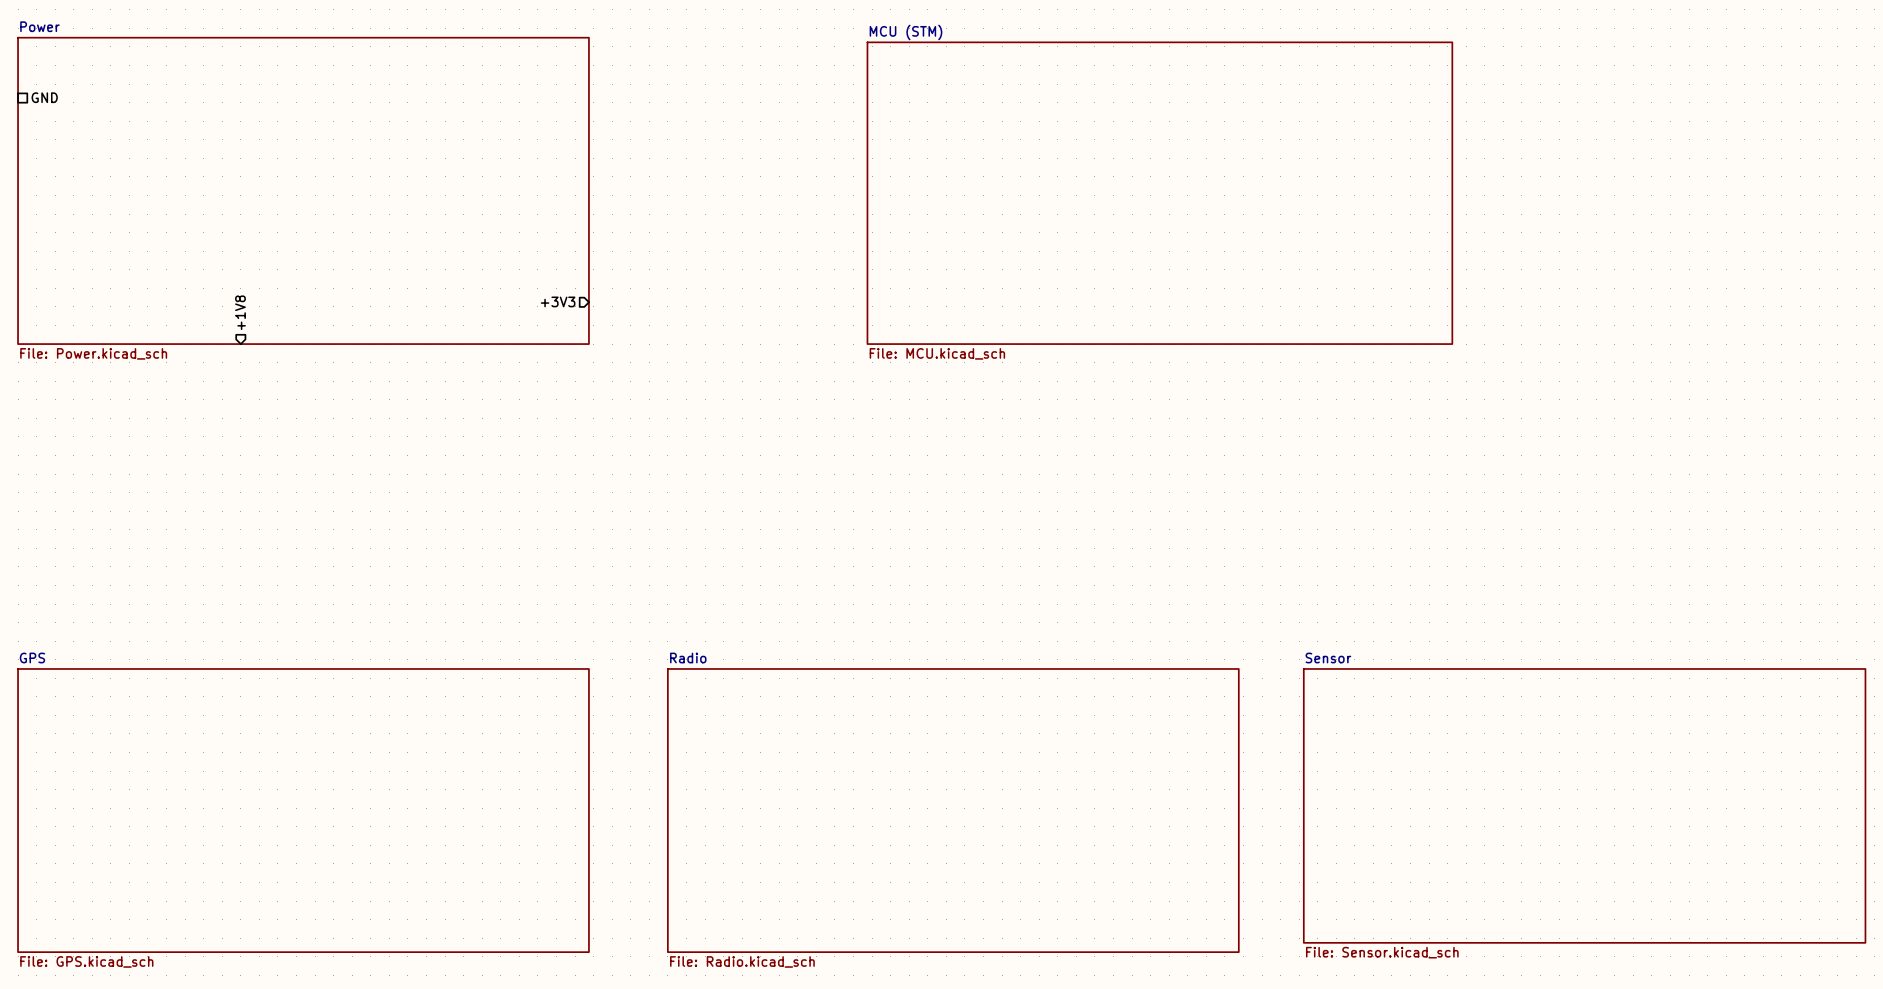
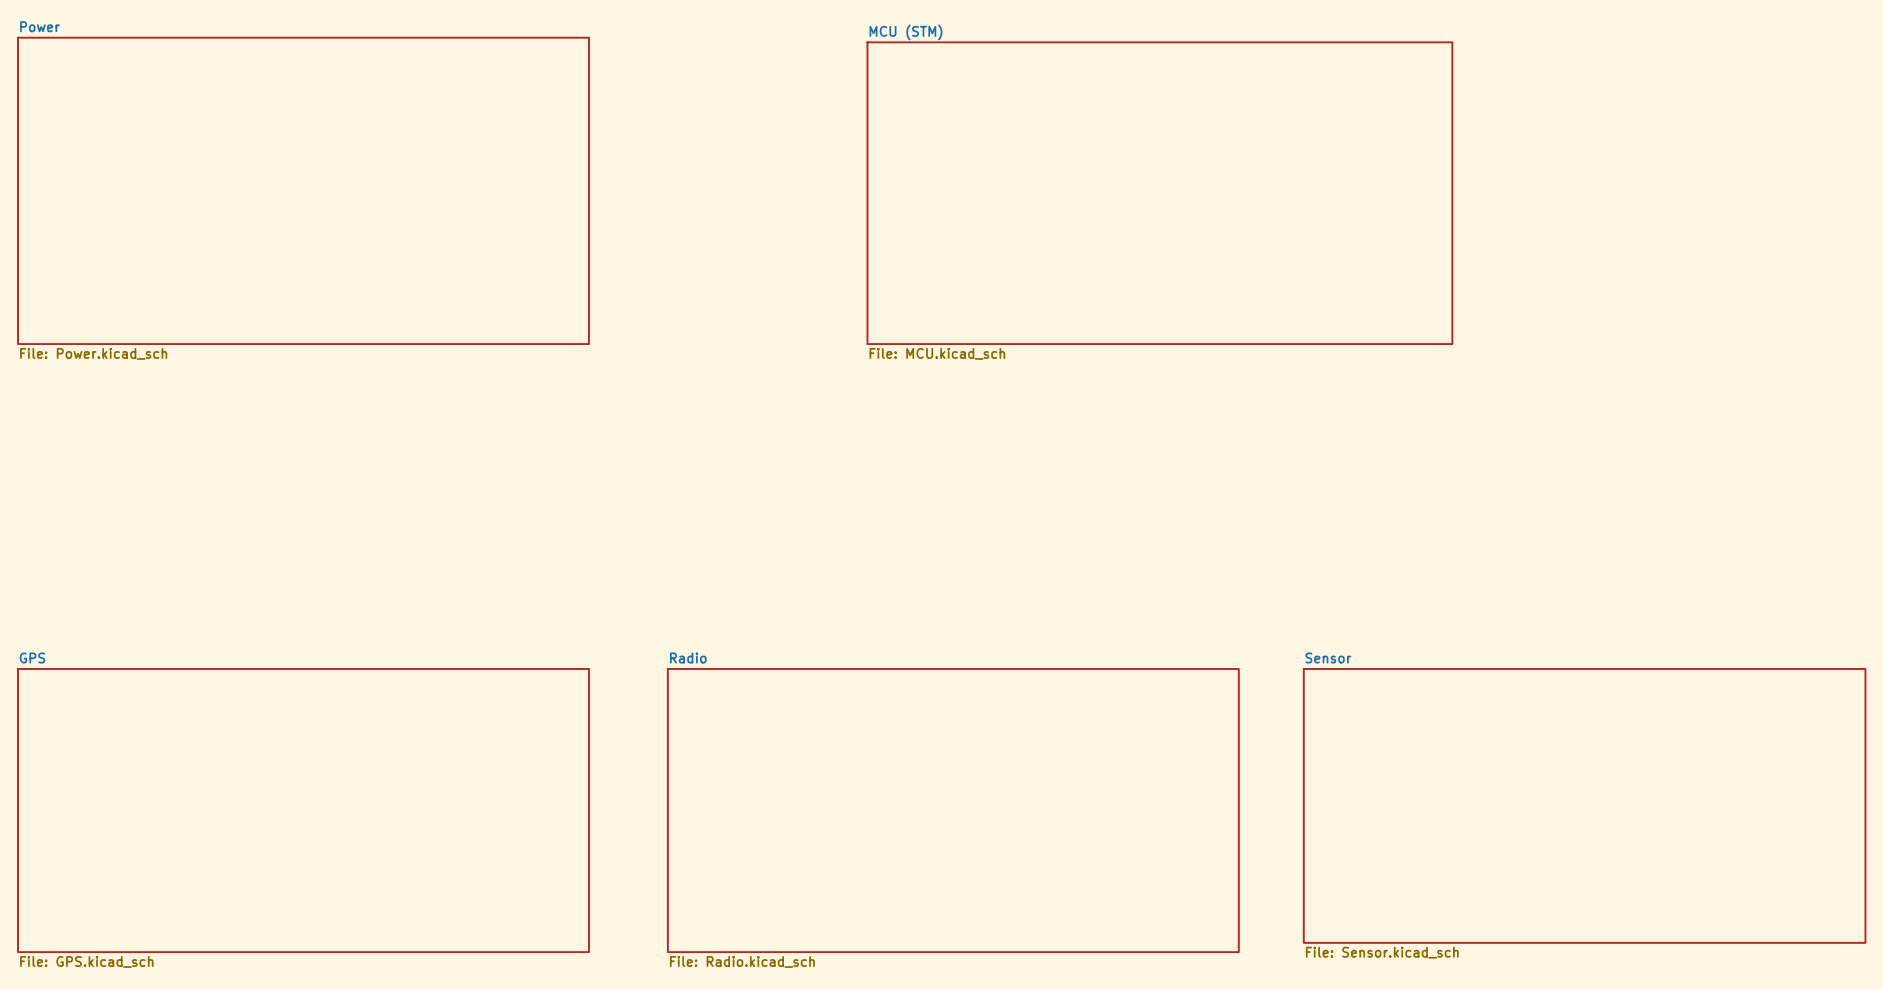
sheet pin: GND (44, 97) -> none
sheet pin: +3V3 (558, 301) -> none
sheet pin: +1V8 (240, 312) -> none

